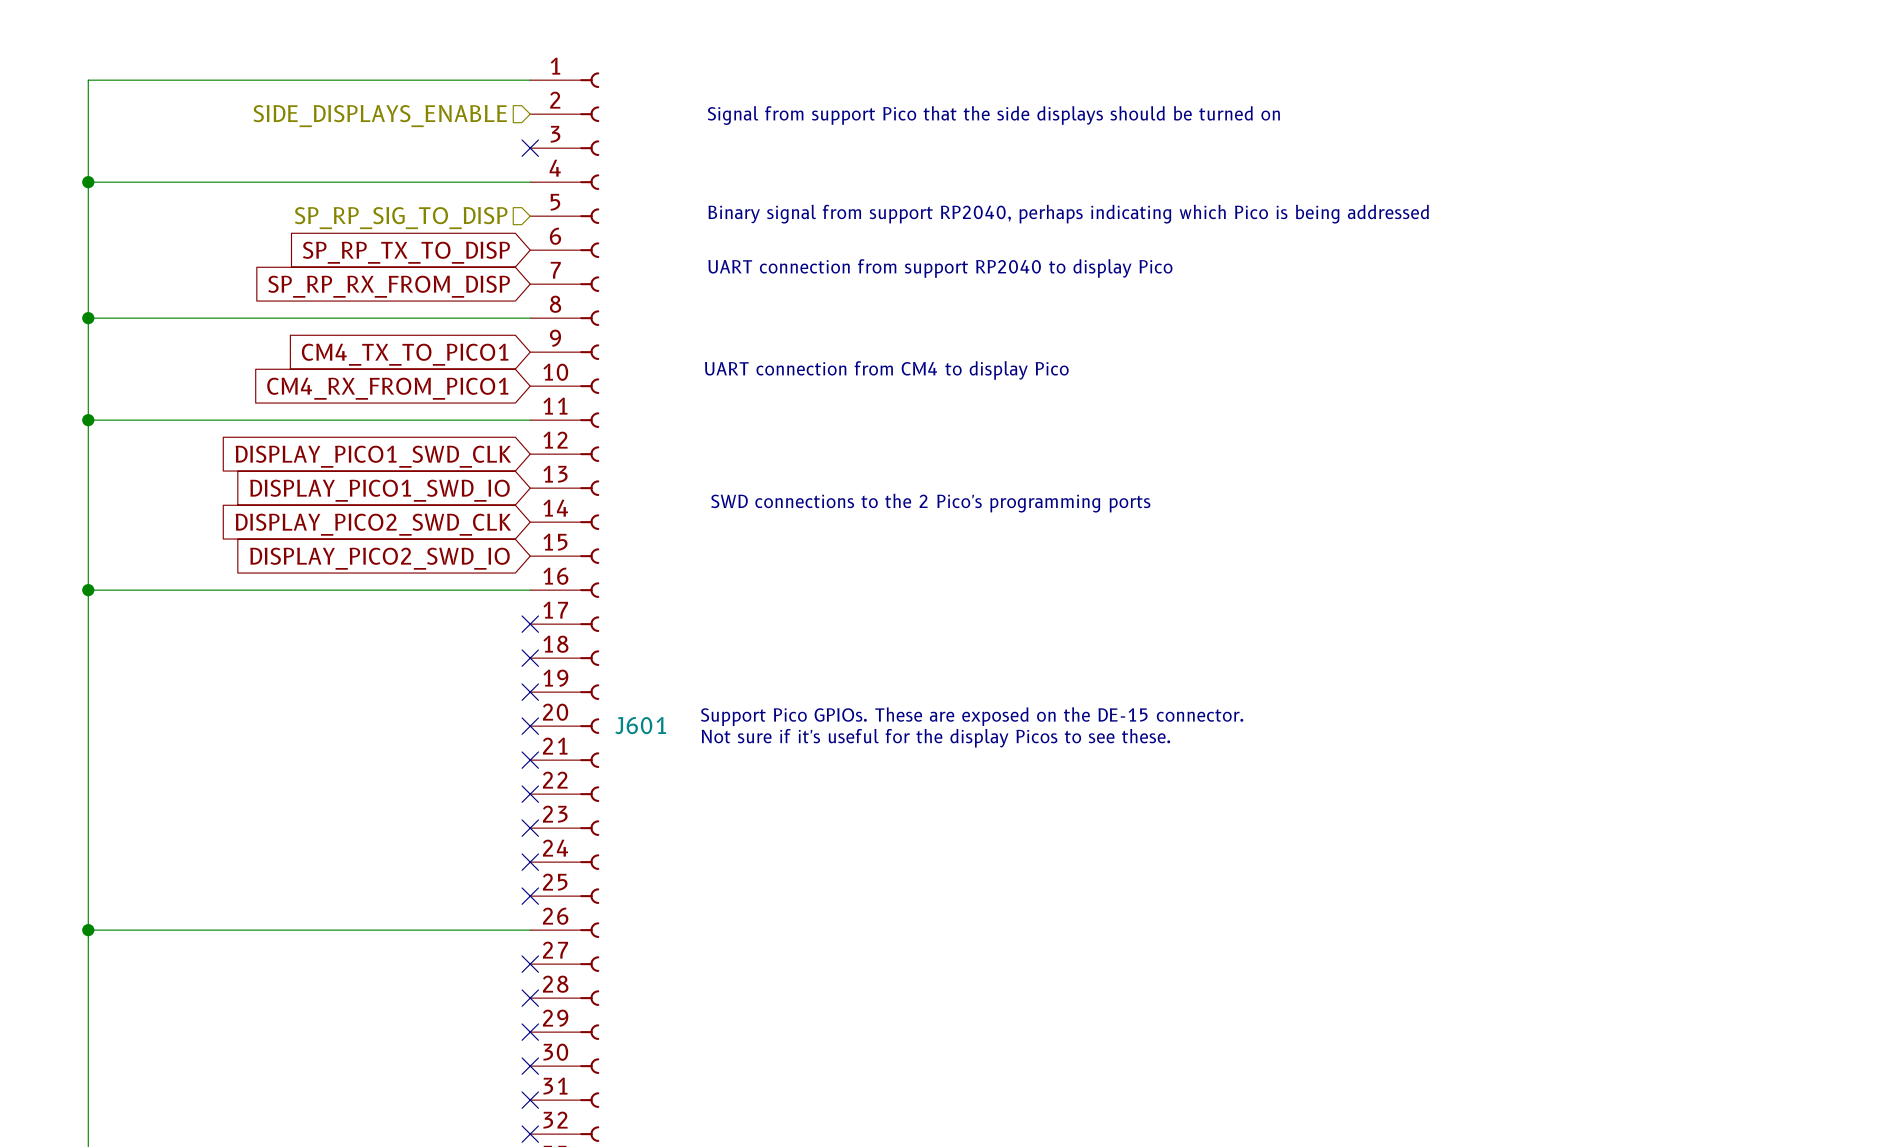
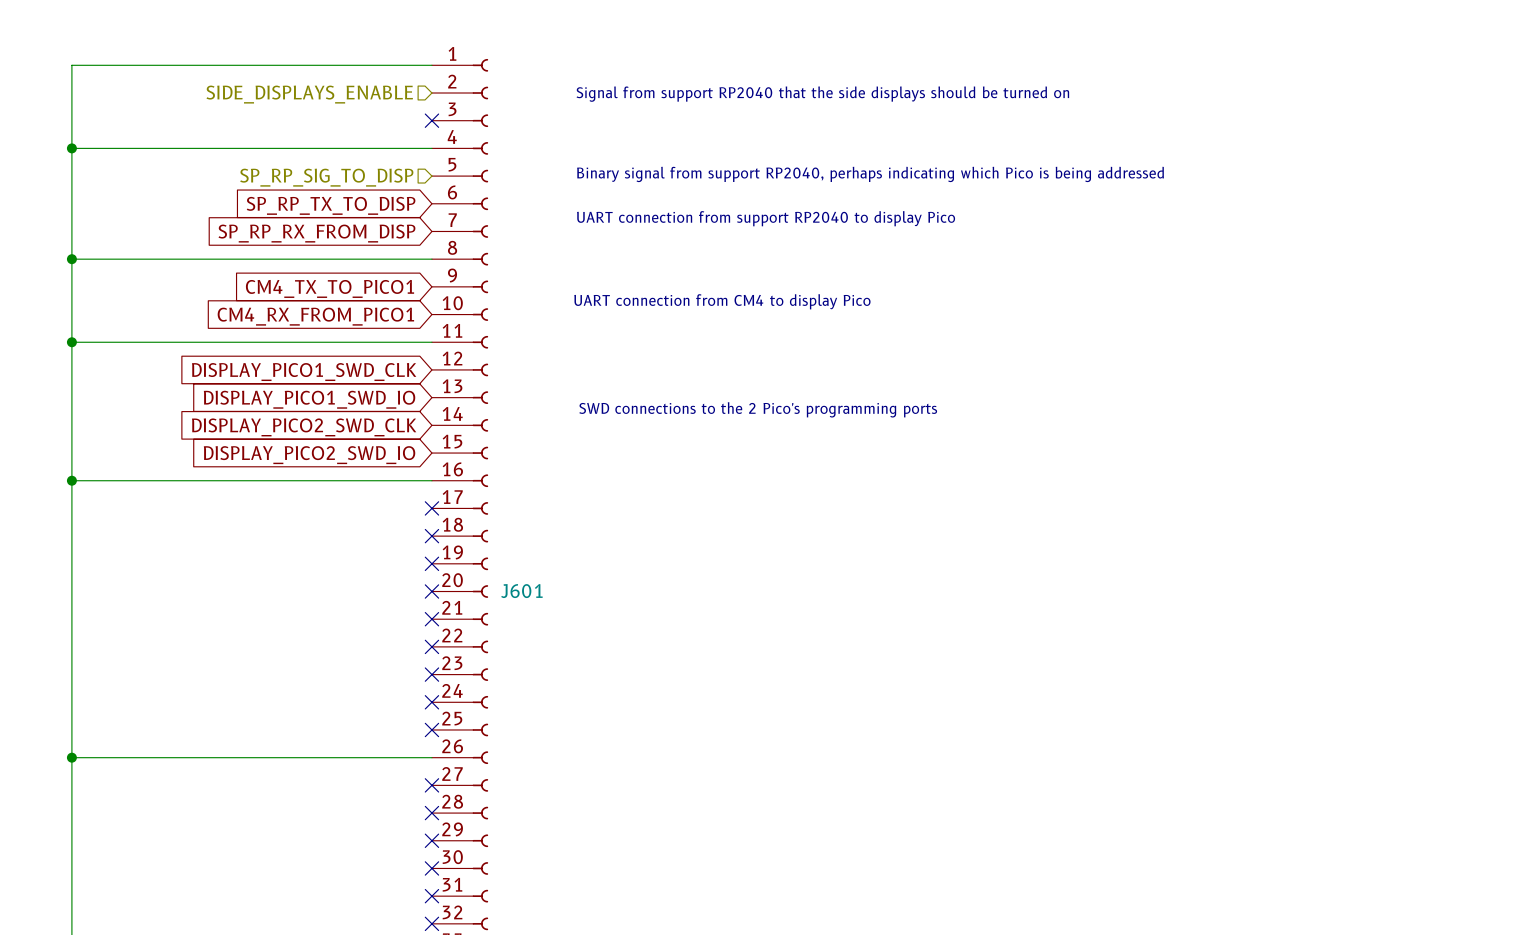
text: Signal from support Pico that the side displays should be turned on (993, 115) -> Signal from support RP2040 that the side displays should be turned on (822, 94)
text: Support Pico GPIOs. These are exposed on the DE-15 connector. (972, 716) -> none
text: Not sure if it's useful for the display Picos to see these. (935, 738) -> none

